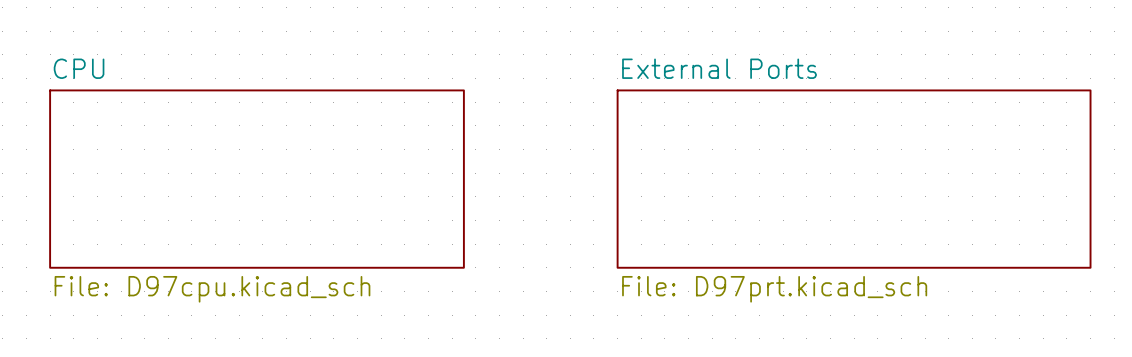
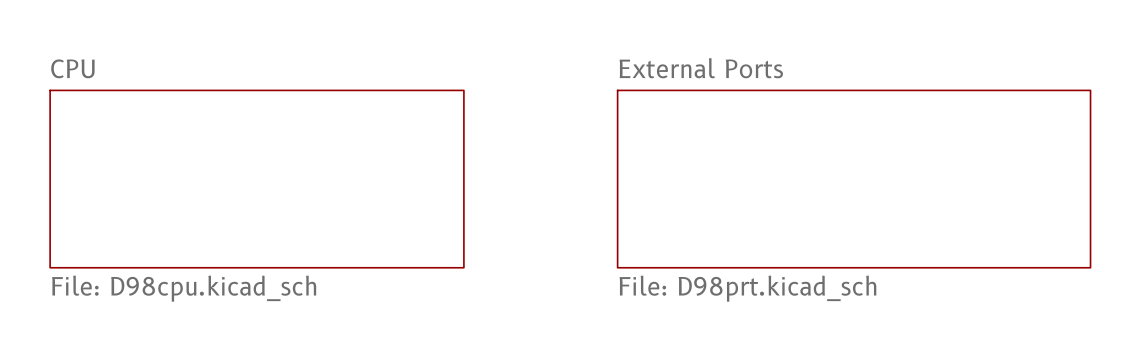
sheet CPU value: File: D97cpu.kicad_sch (212, 289) -> File: D98cpu.kicad_sch (184, 288)
sheet External Ports value: File: D97prt.kicad_sch (774, 289) -> File: D98prt.kicad_sch (747, 288)

